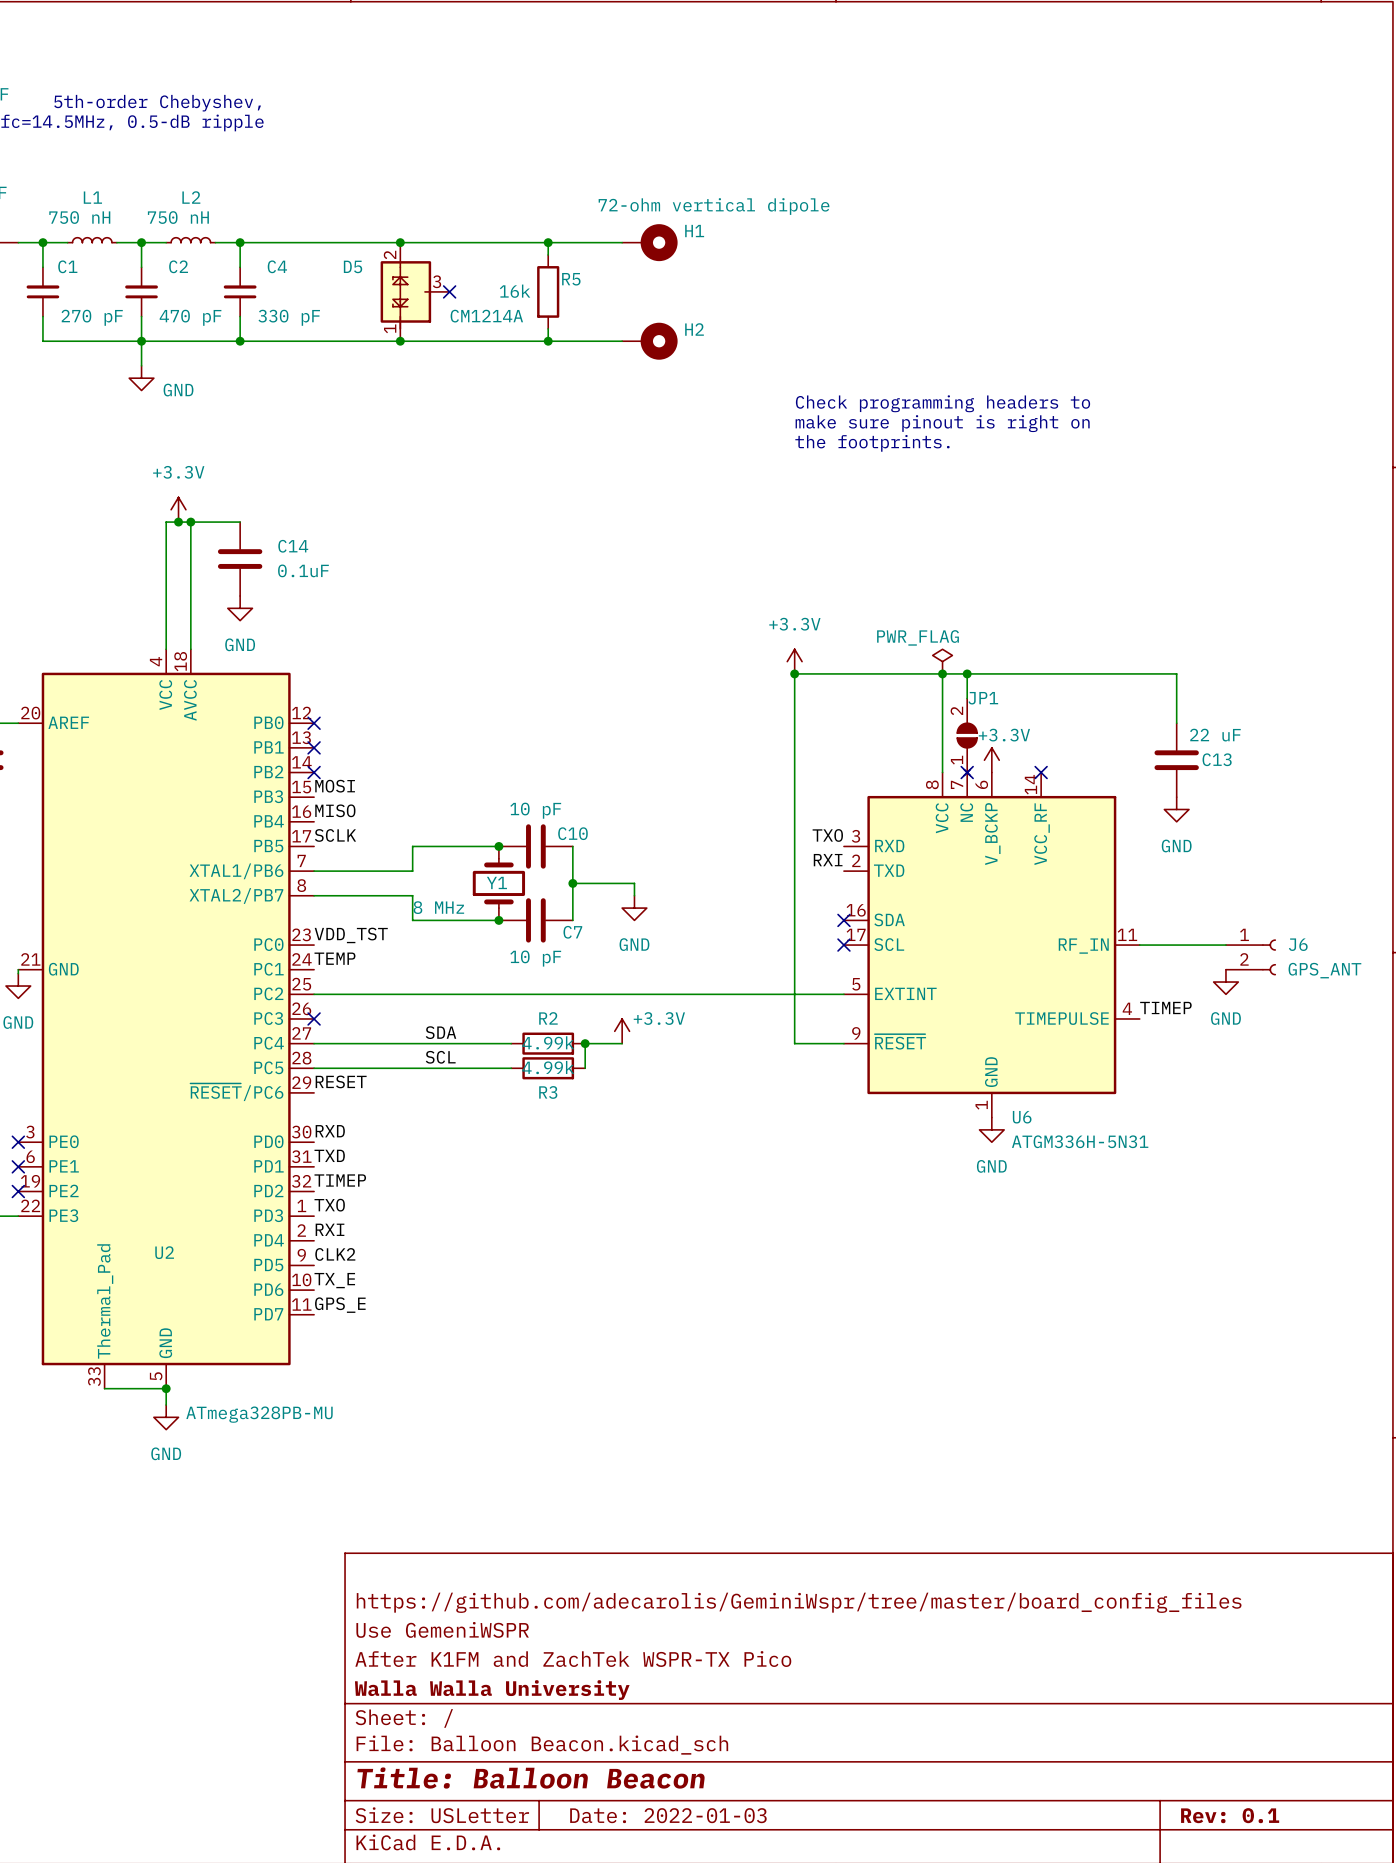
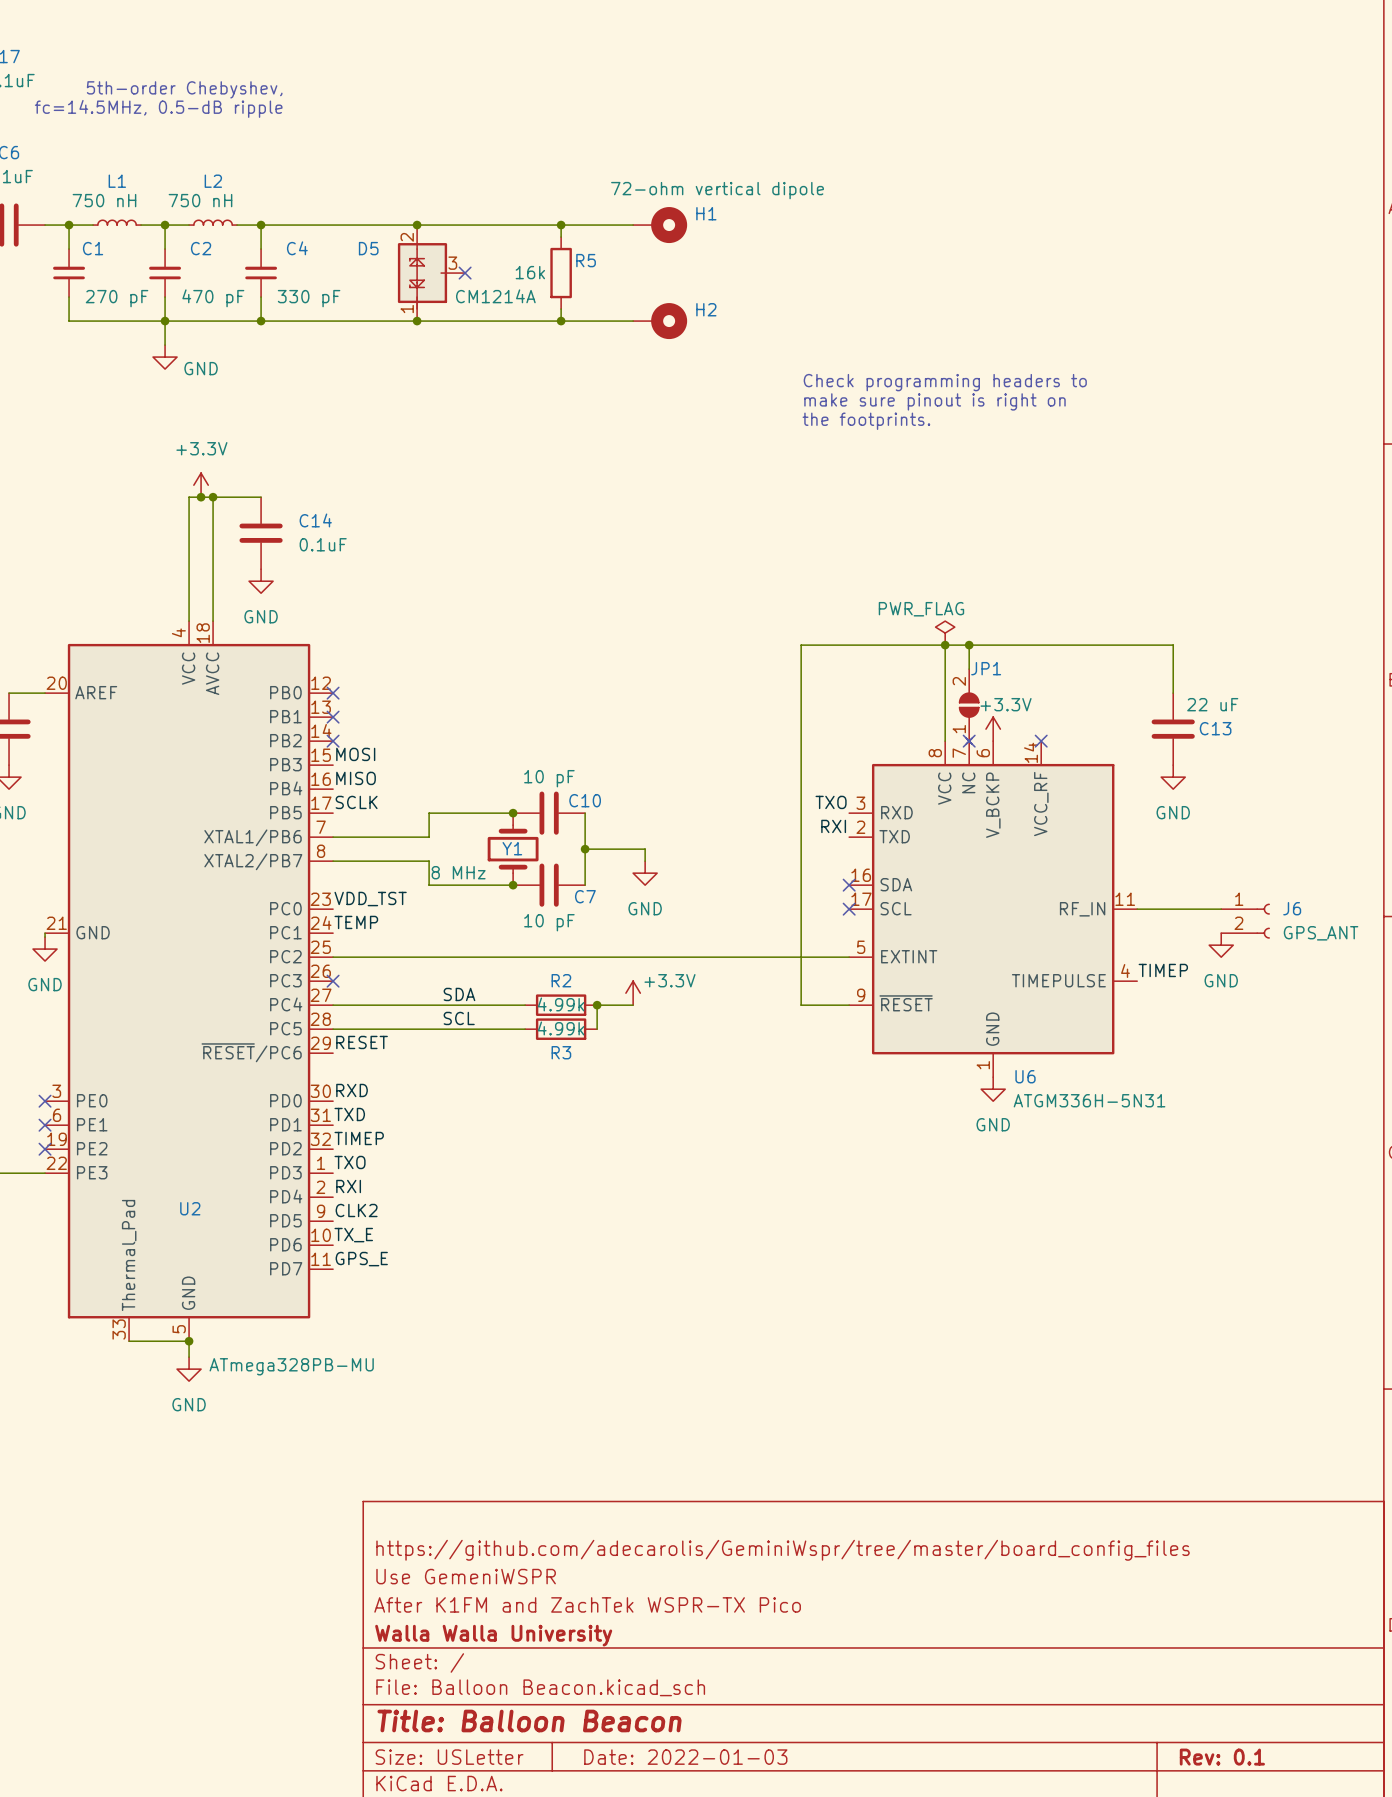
power symbol: +3.3V (794, 661) -> none
junction: (794, 673) -> none

